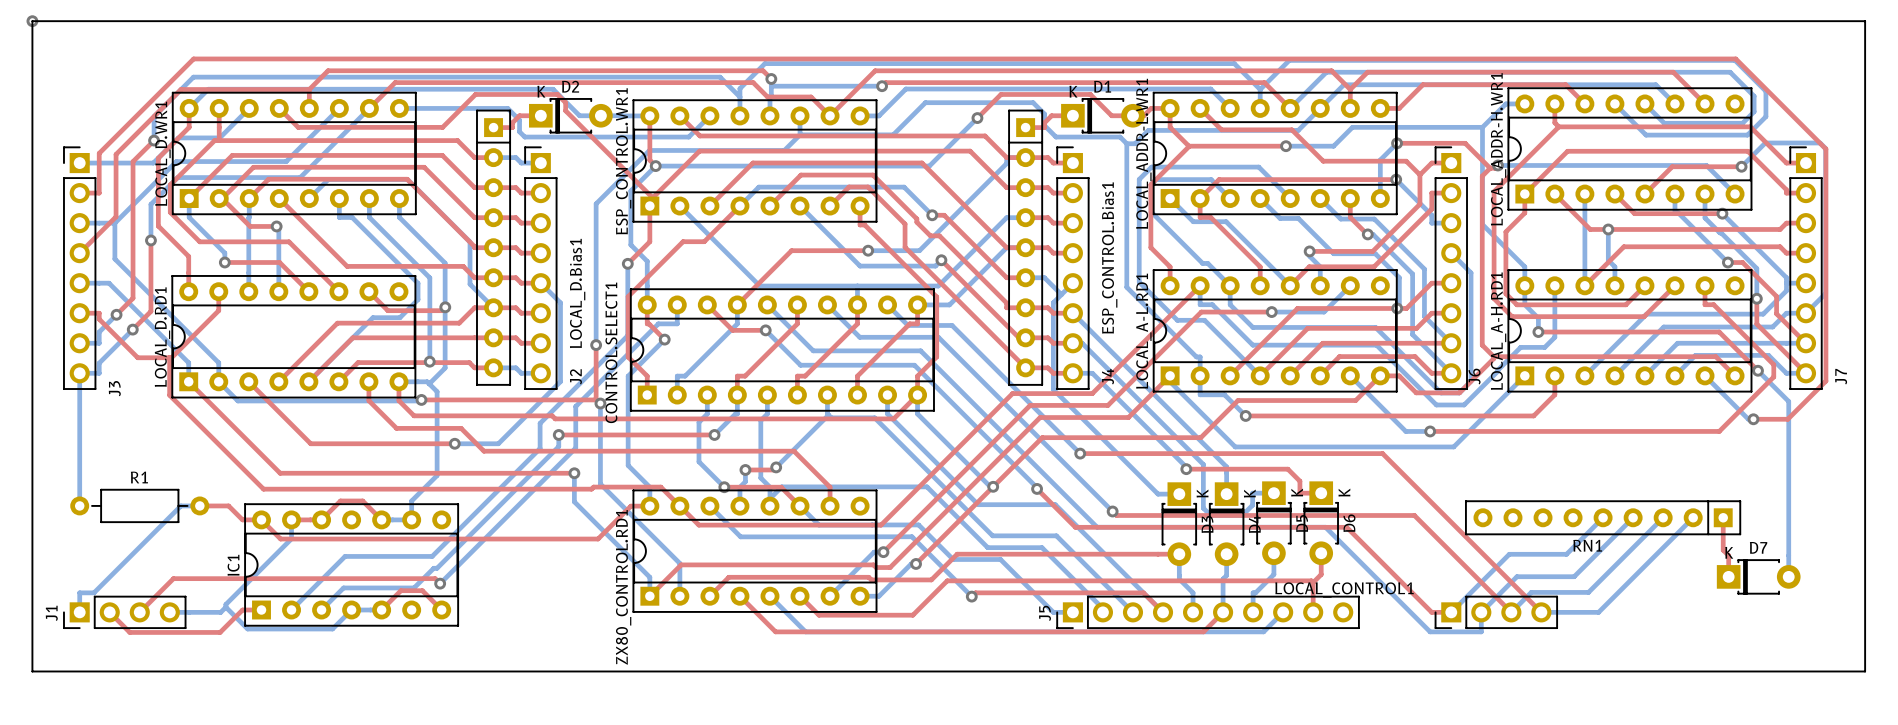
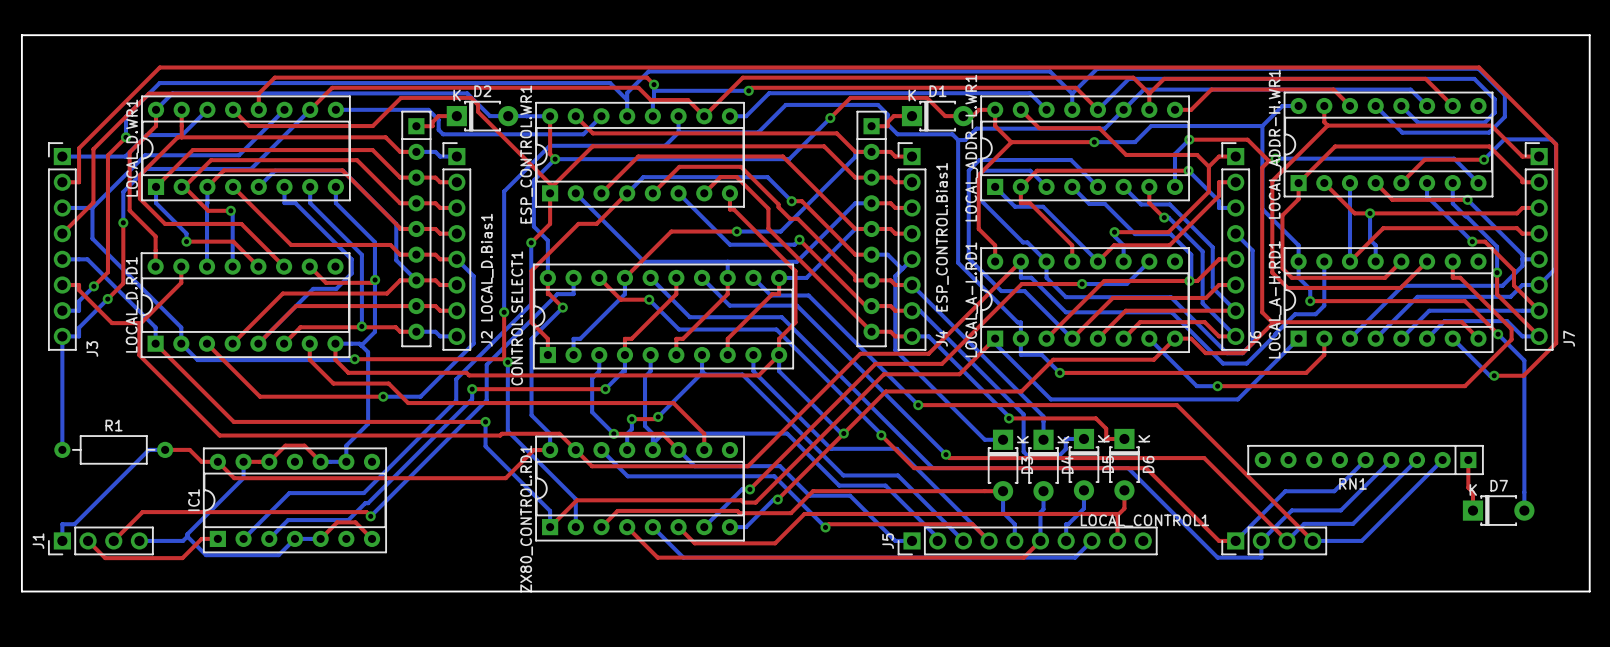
via: (32, 21) -> none

